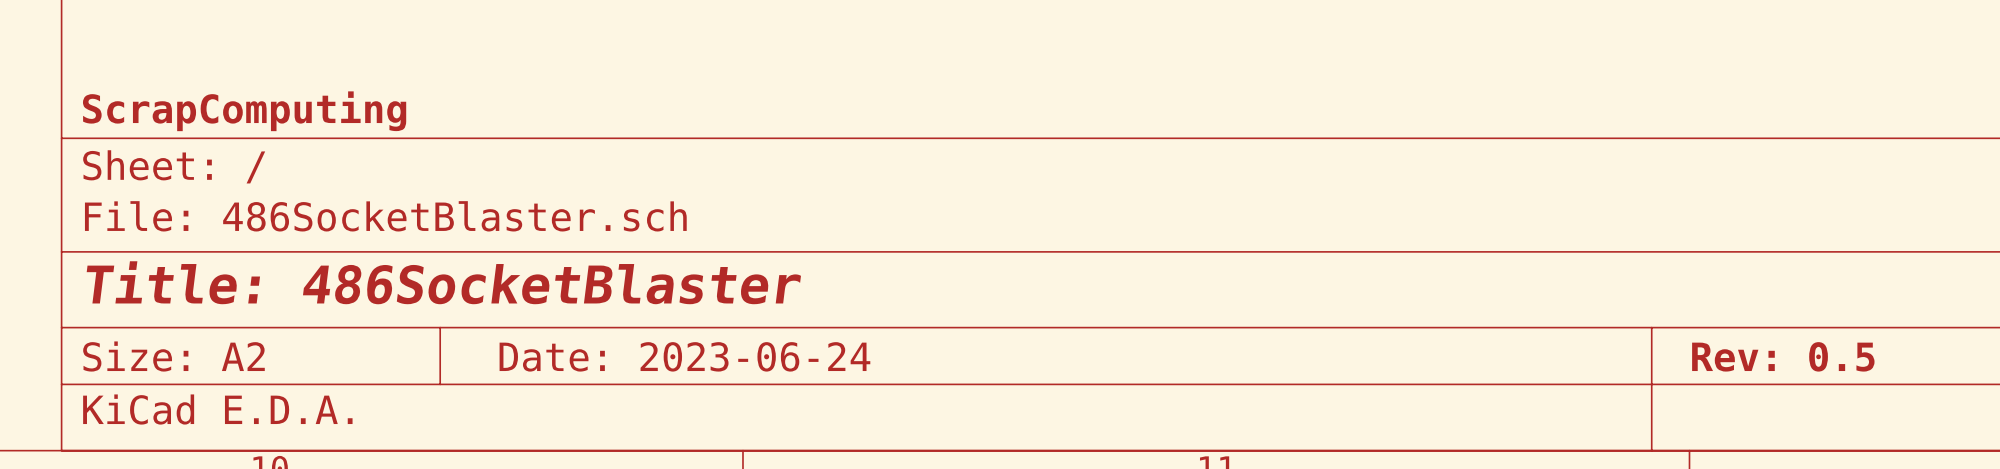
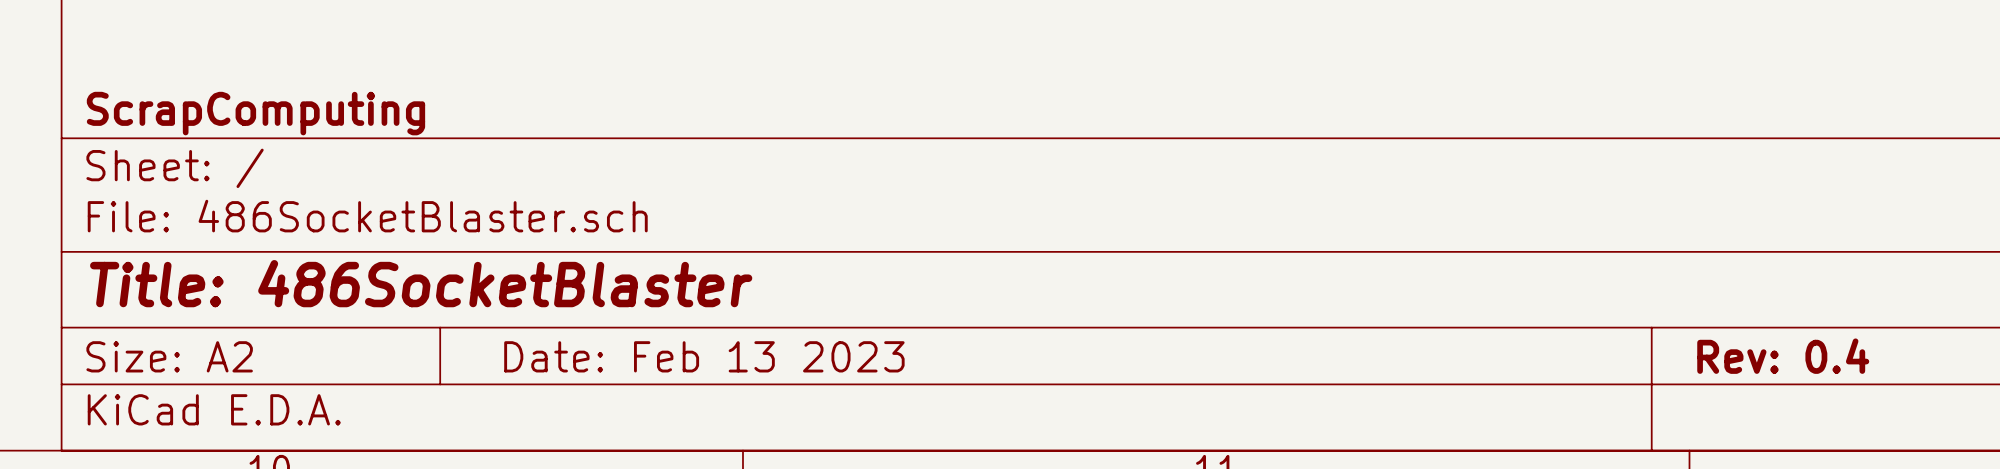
title block: Date: 2023-06-24 (684, 356) -> Date: Feb 13 2023 (704, 356)
title block: Rev: 0.5 (1783, 356) -> Rev: 0.4 (1783, 356)

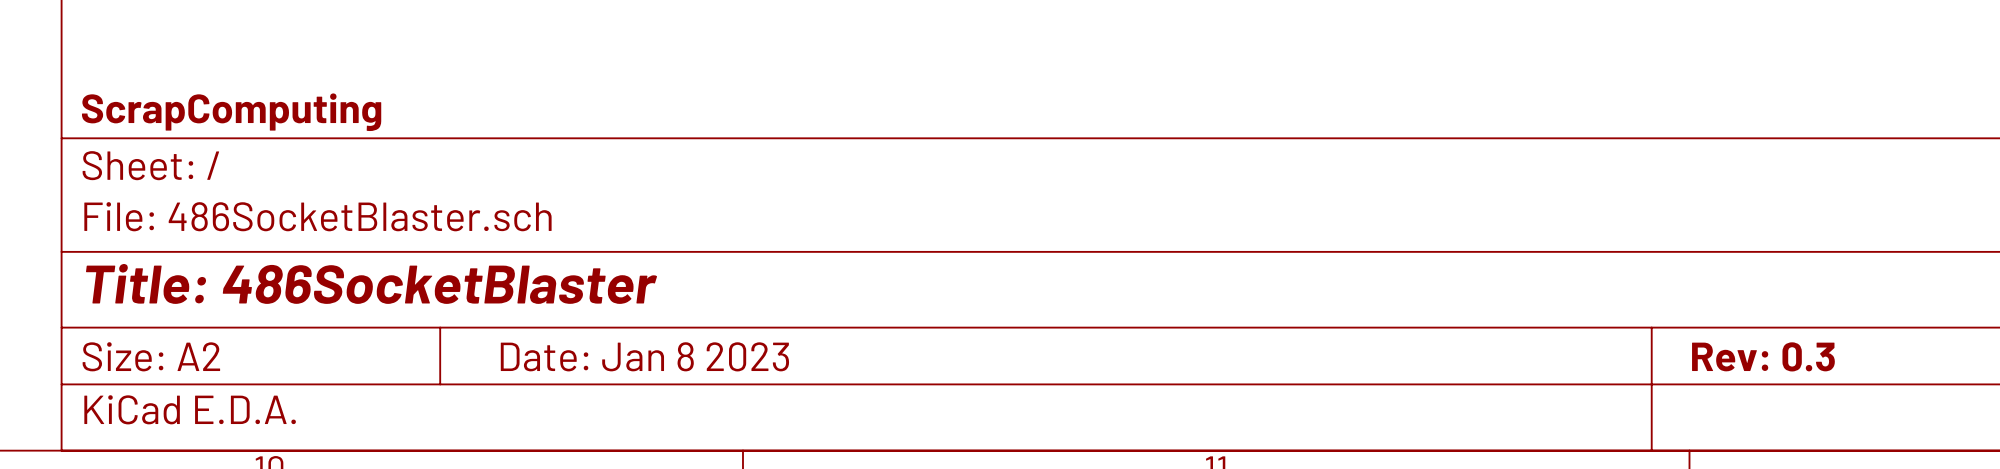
title block: Date: Feb 13 2023 (704, 356) -> Date: Jan 8 2023 (644, 356)
title block: Rev: 0.4 (1783, 356) -> Rev: 0.3 (1763, 356)

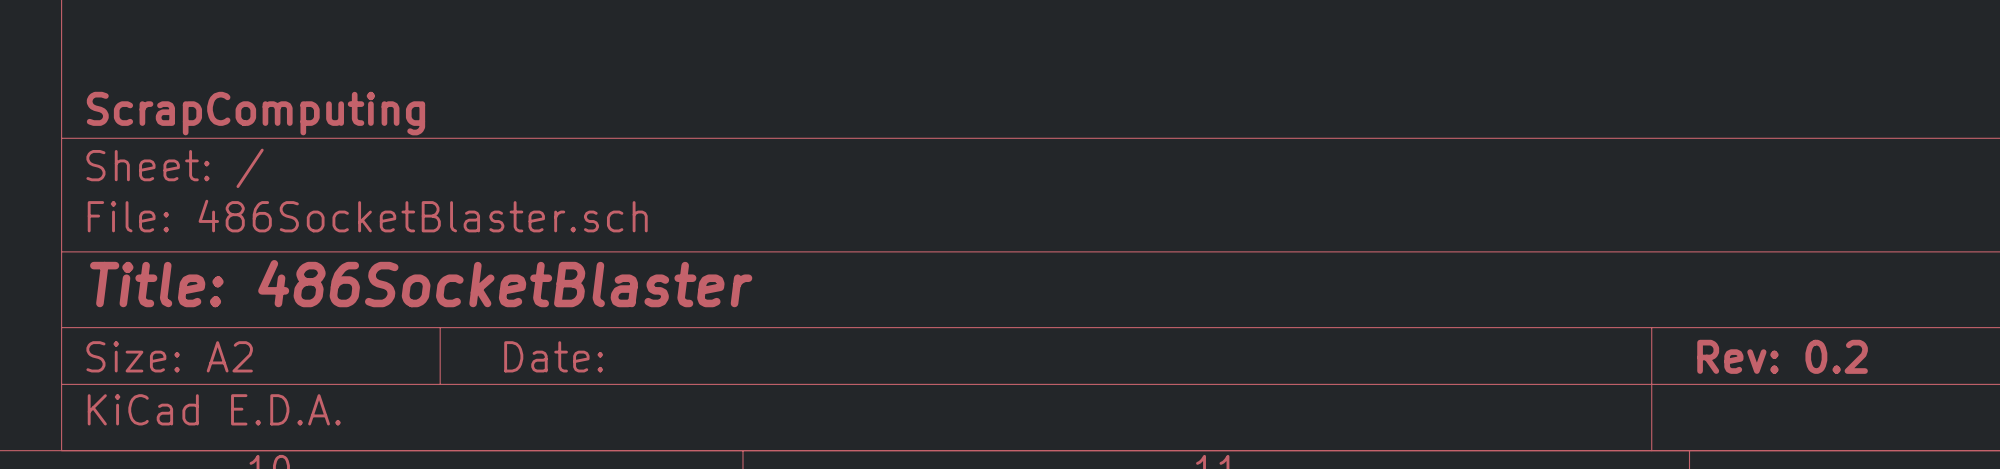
title block: Date: Jan 8 2023 (644, 356) -> Date: (553, 356)
title block: Rev: 0.3 (1763, 356) -> Rev: 0.2 (1782, 356)

